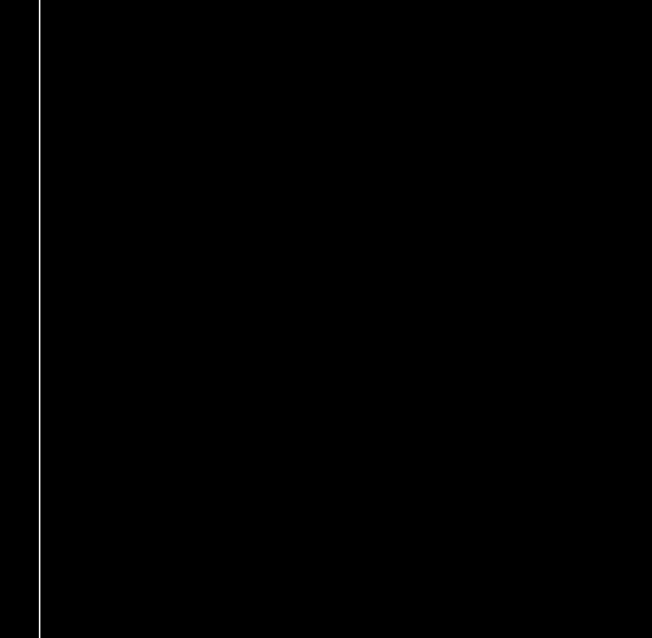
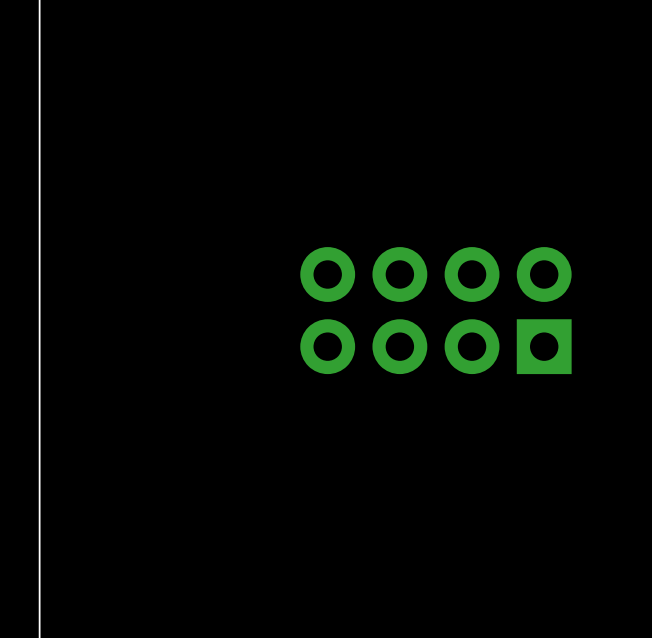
part: none -> (435, 310)

